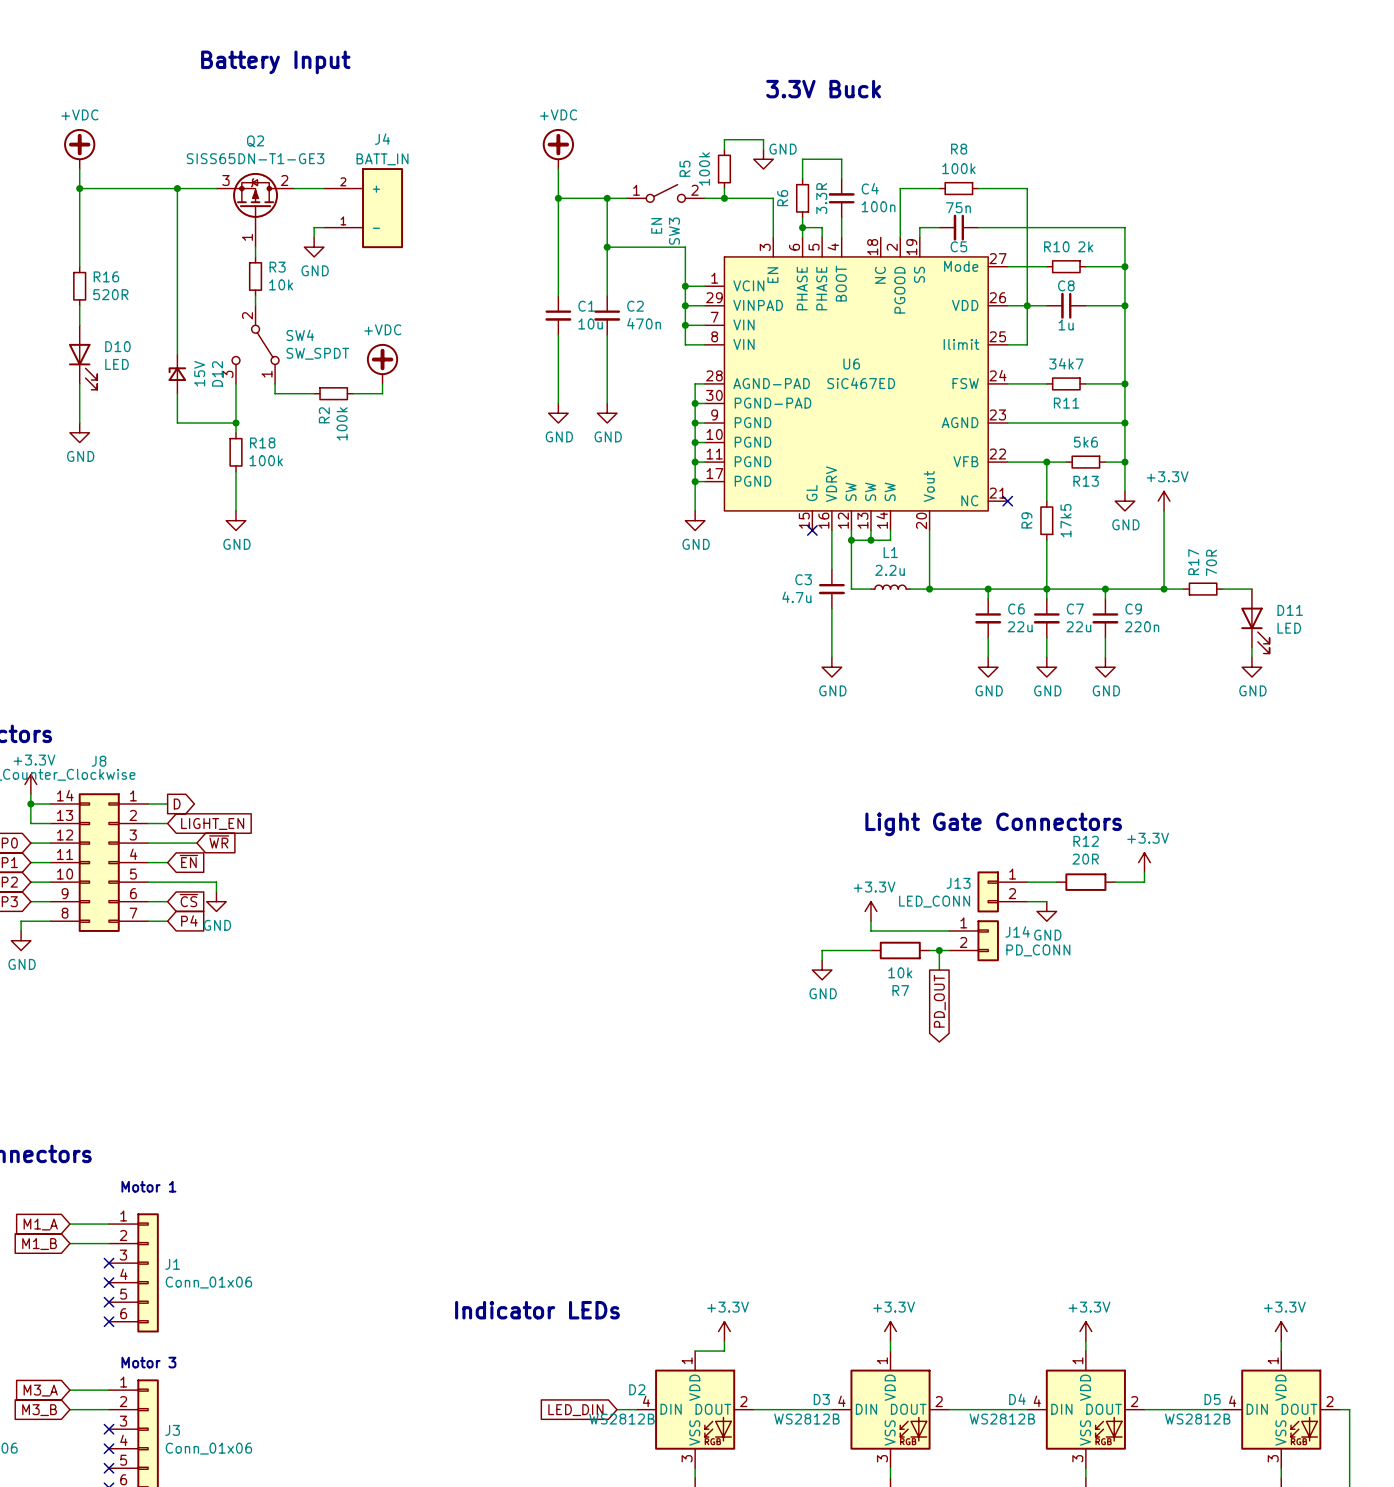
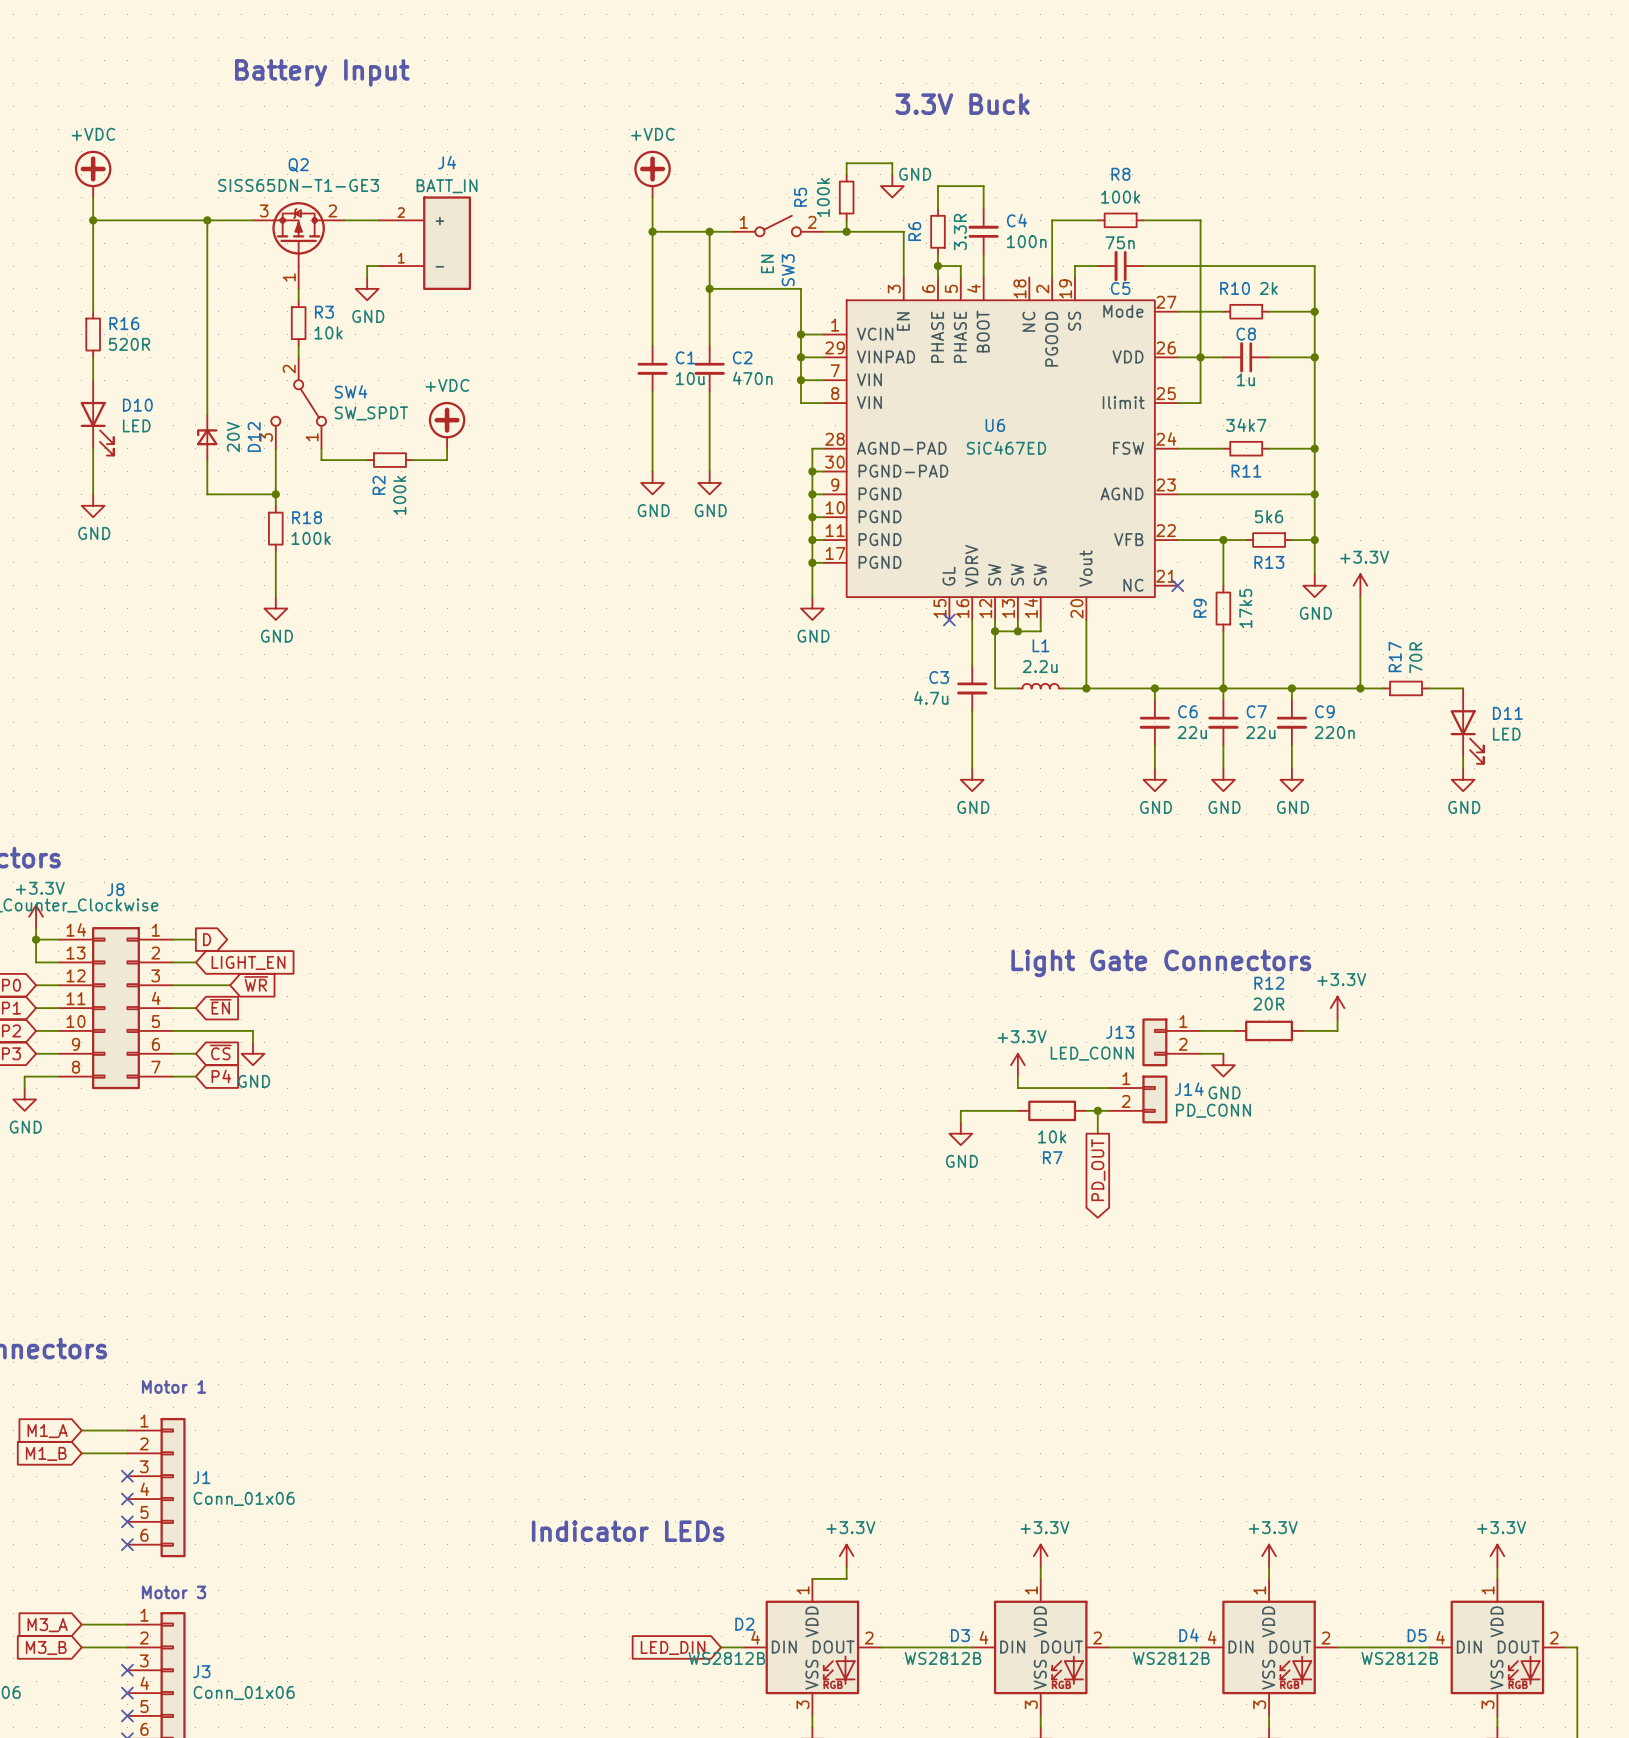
D12 value: 15V (199, 373) -> 20V (233, 437)

